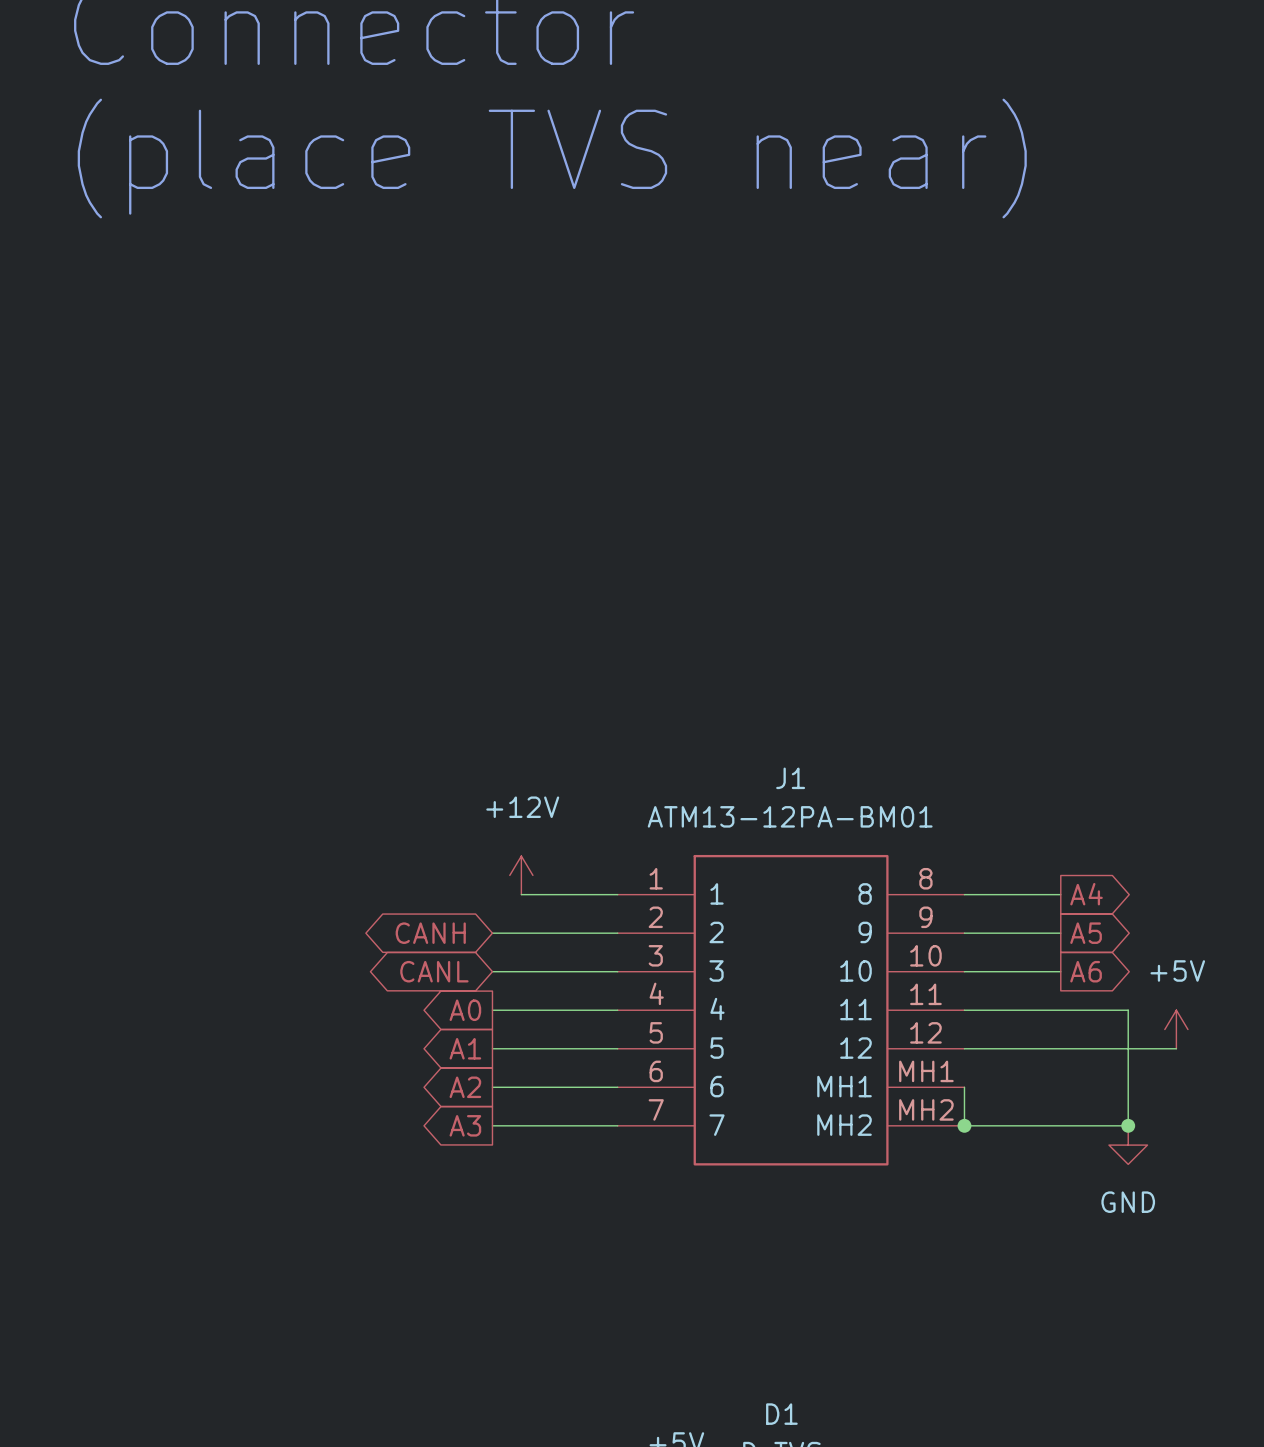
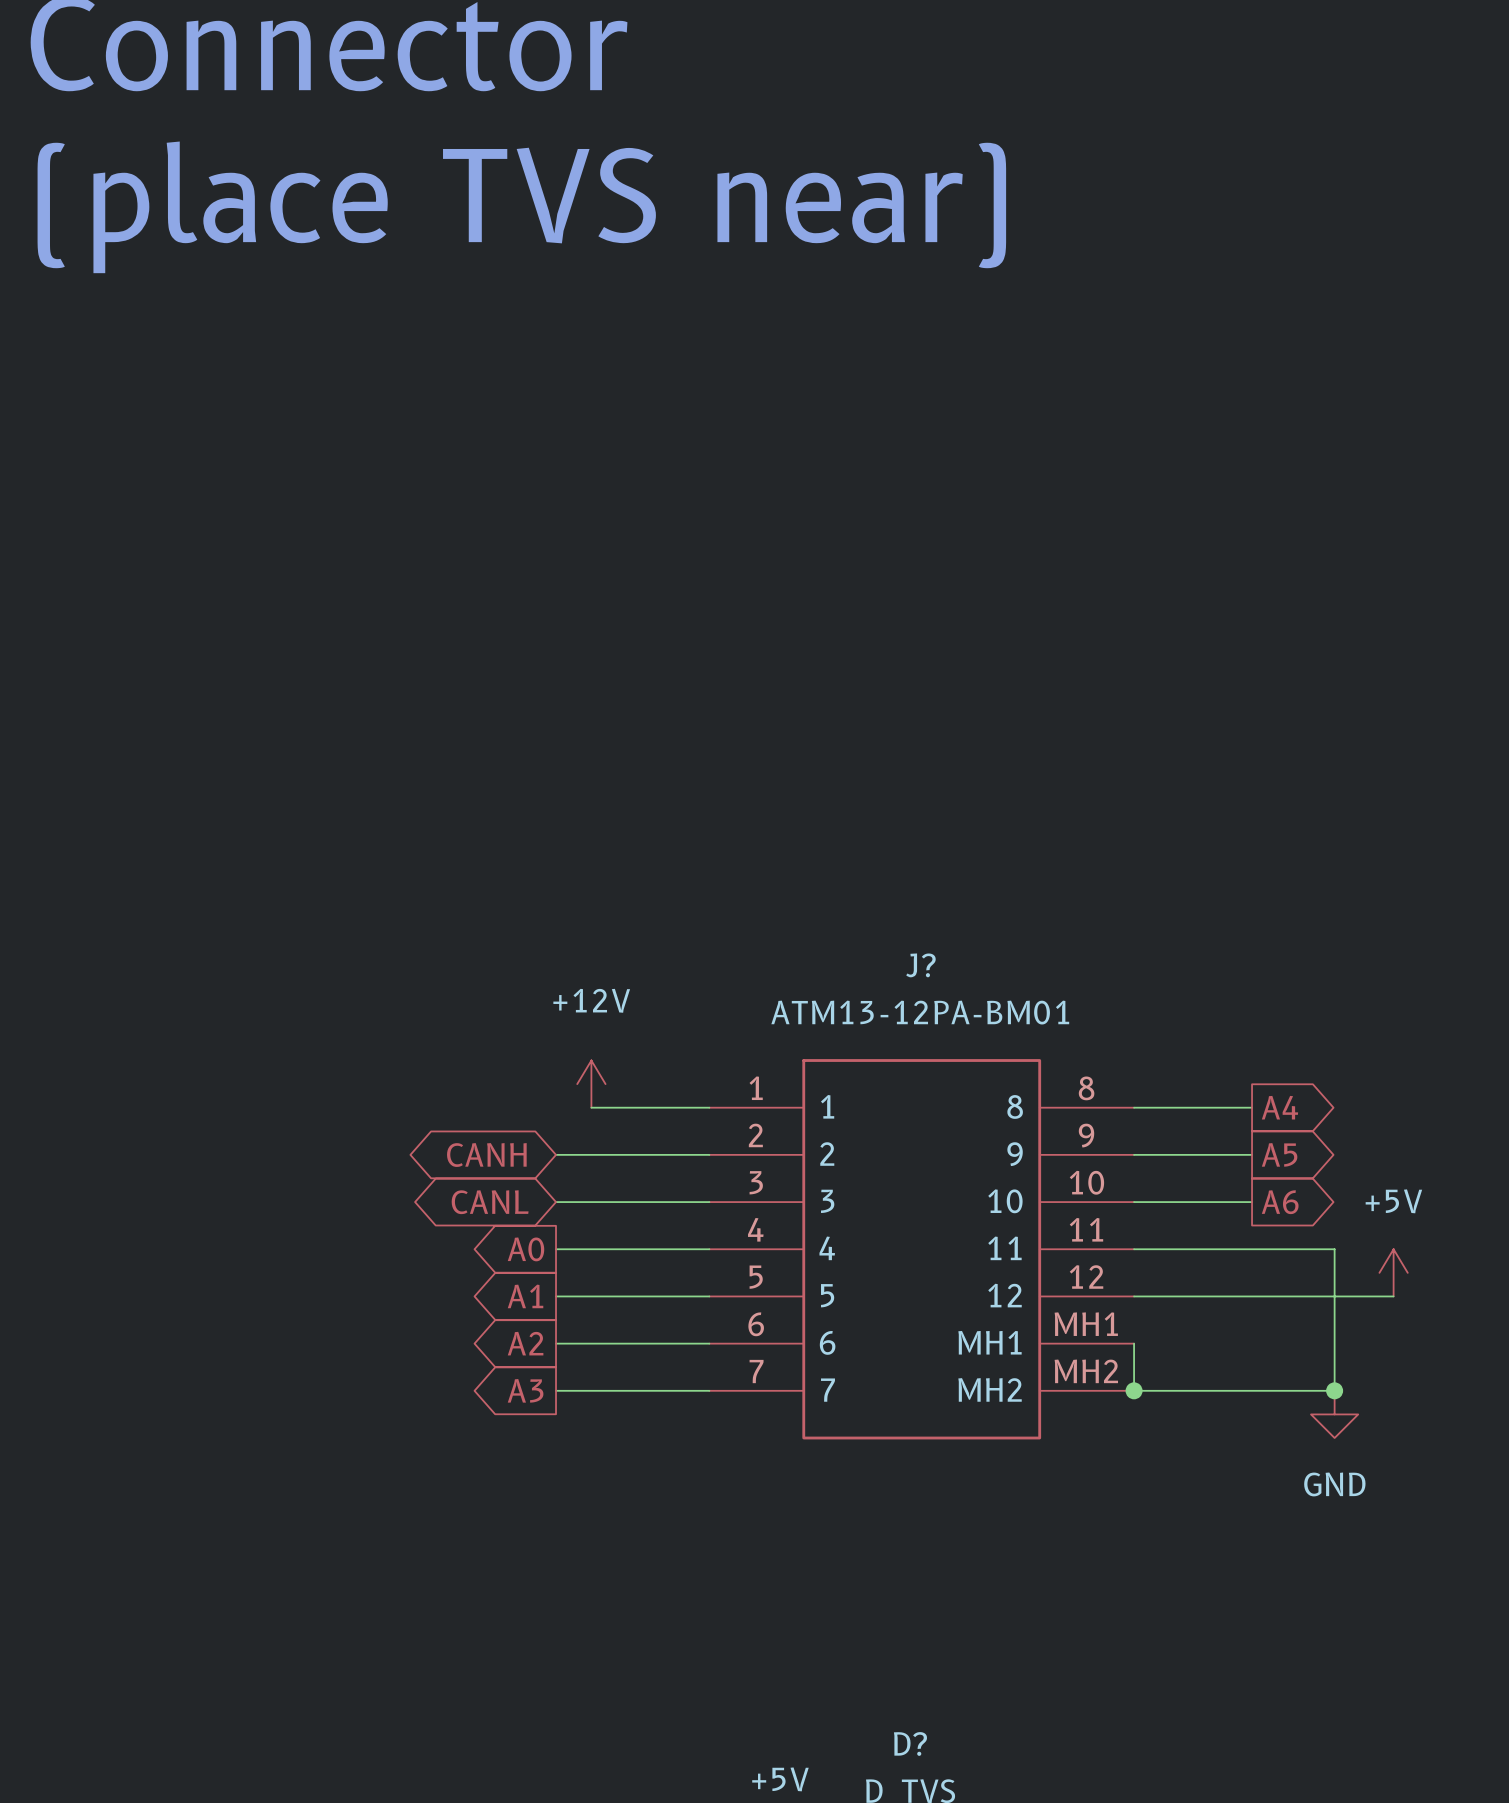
J1 name: J1 (790, 778) -> J? (920, 965)
D1 name: D1 (781, 1414) -> D? (910, 1743)

